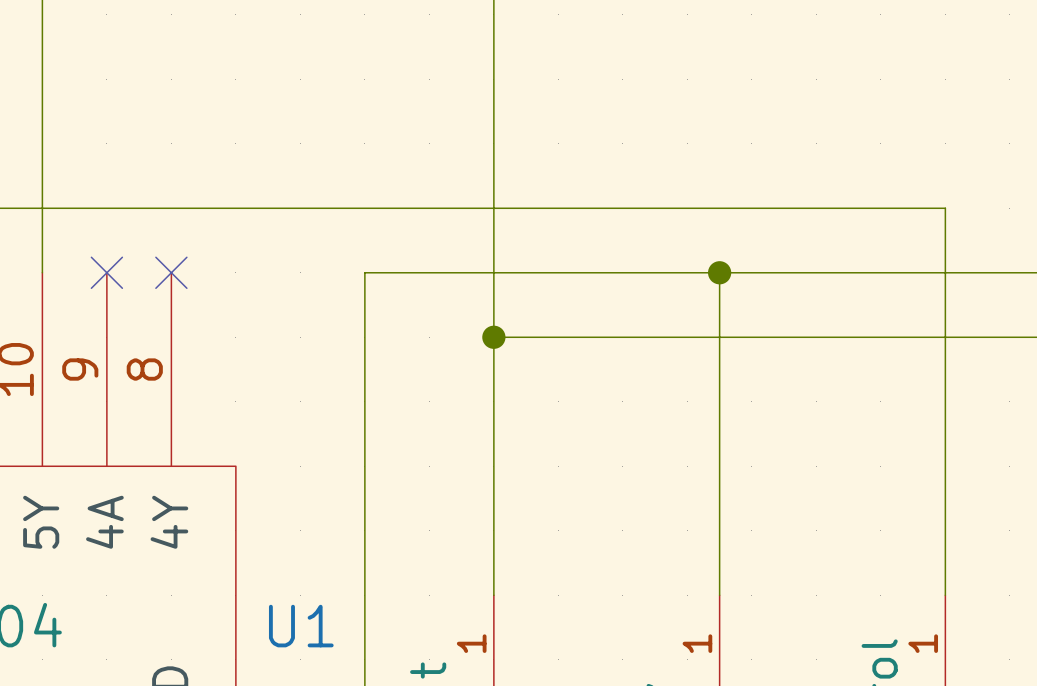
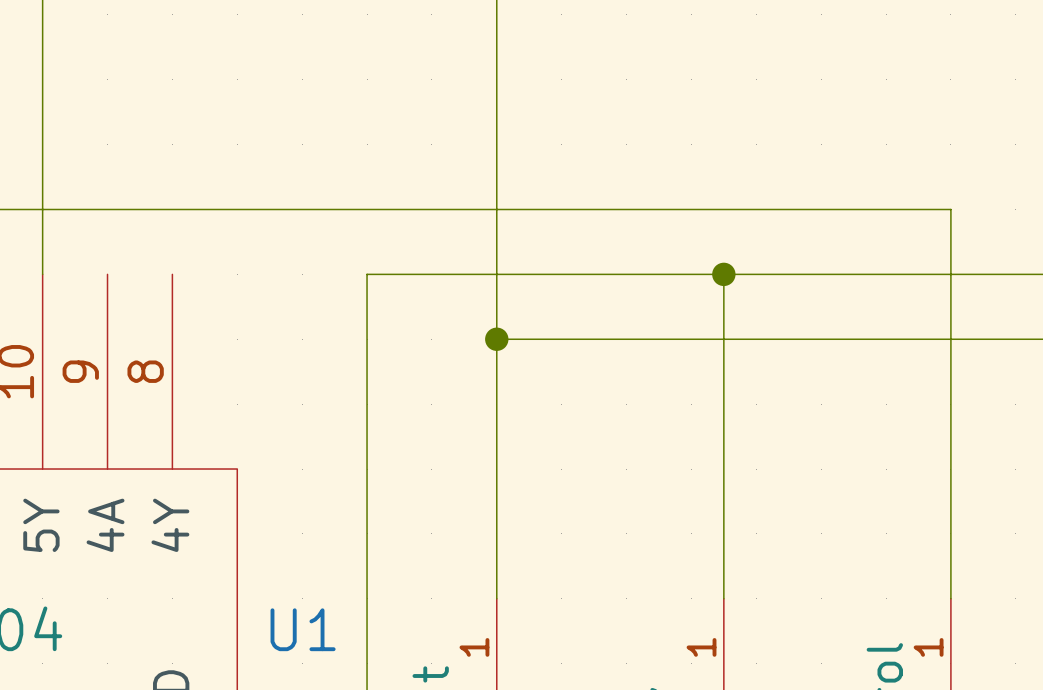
no-connect mark: (106, 272) -> none
no-connect mark: (171, 272) -> none

